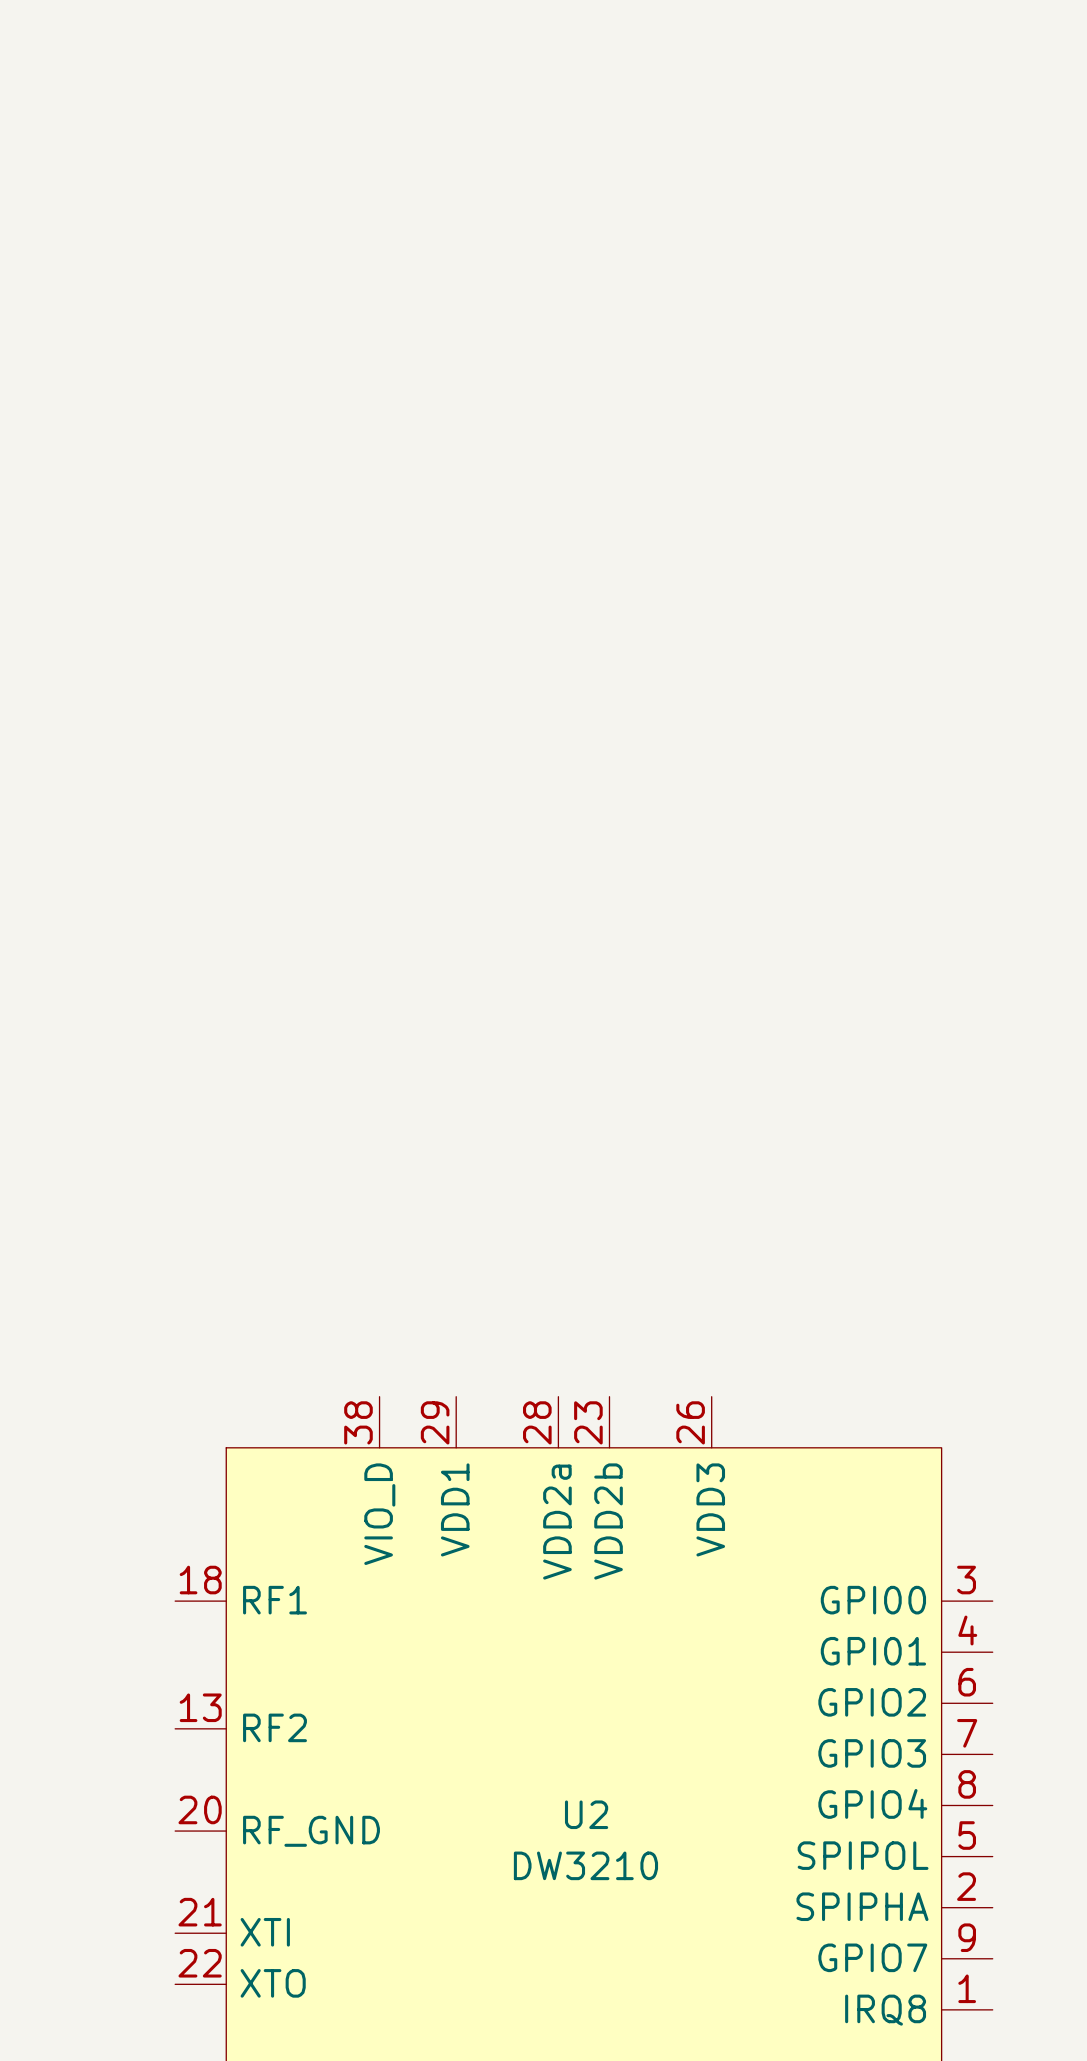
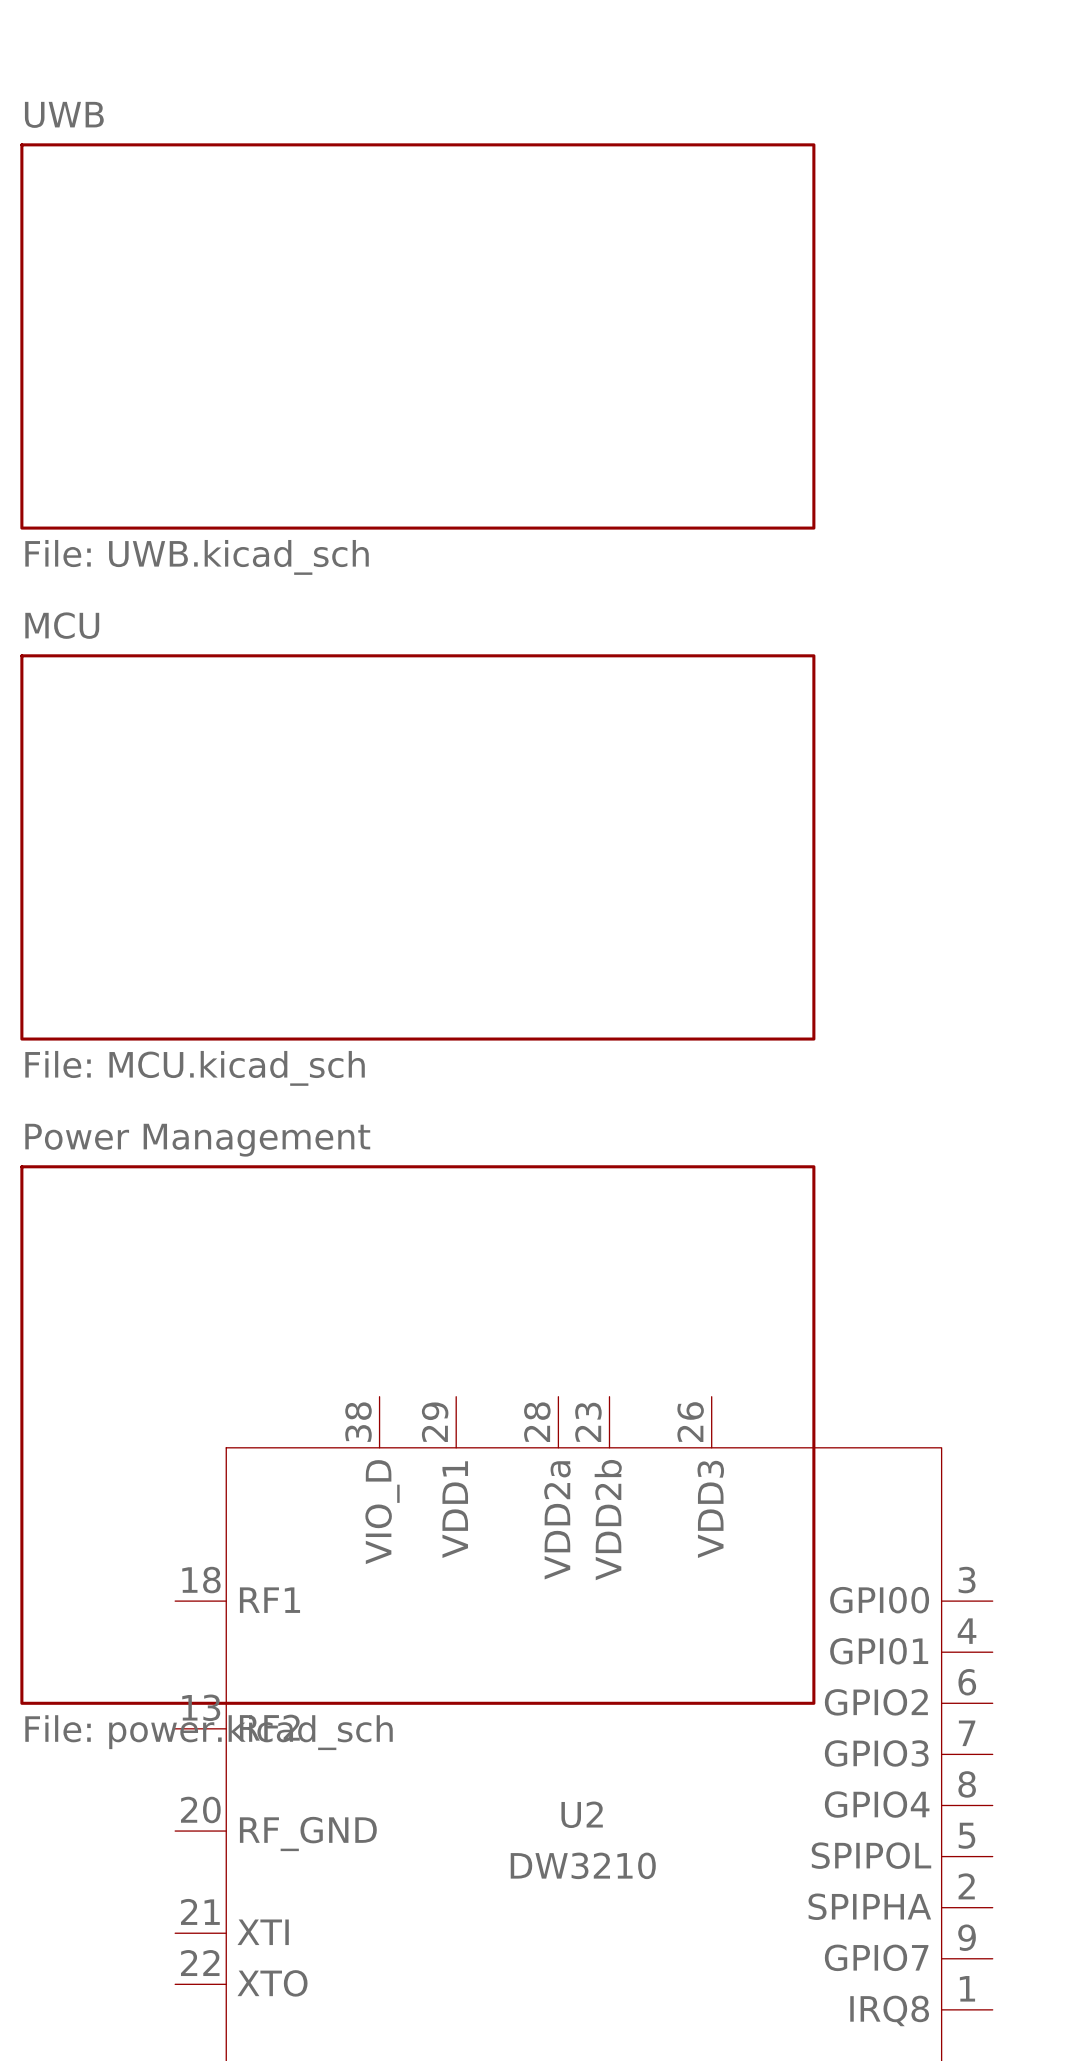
sheet UWB: none -> File: UWB.kicad_sch (417, 336)
sheet MCU: none -> File: MCU.kicad_sch (417, 847)
sheet Power Management: none -> File: power.kicad_sch (417, 1435)

